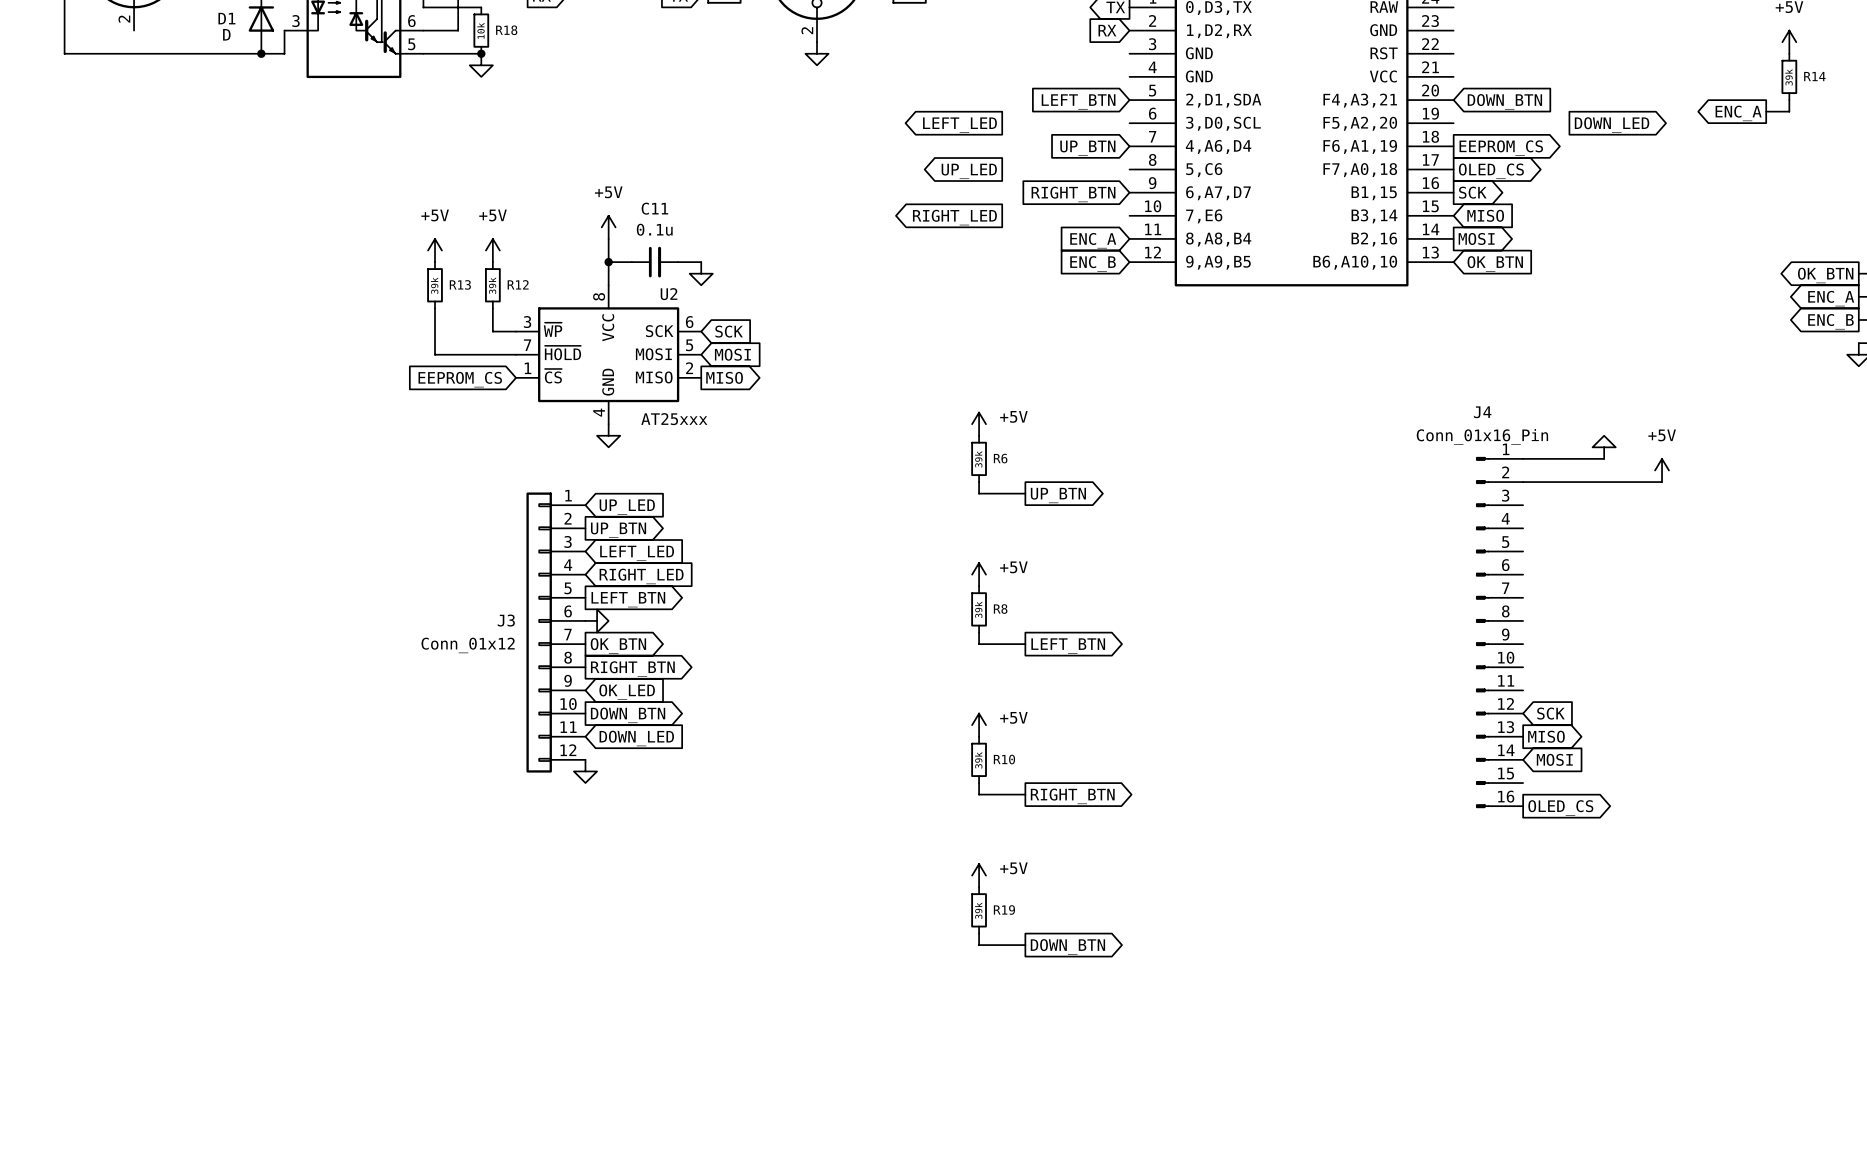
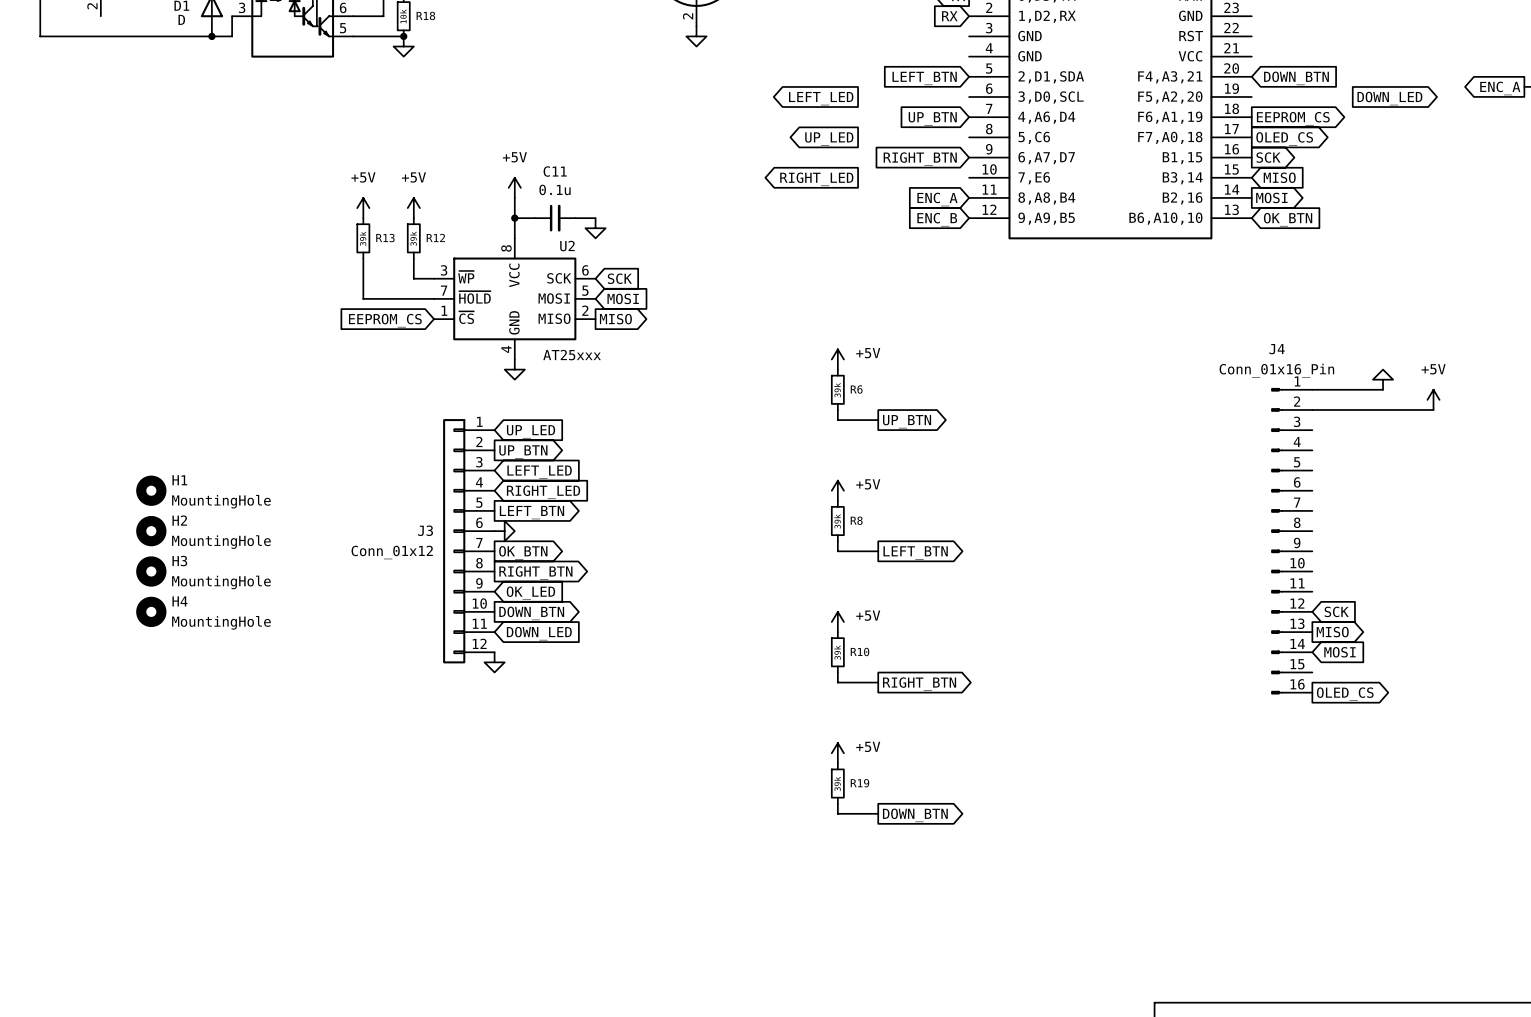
H1: none -> MountingHole (151, 490)
H2: none -> MountingHole (151, 531)
H3: none -> MountingHole (151, 571)
H4: none -> MountingHole (151, 611)

